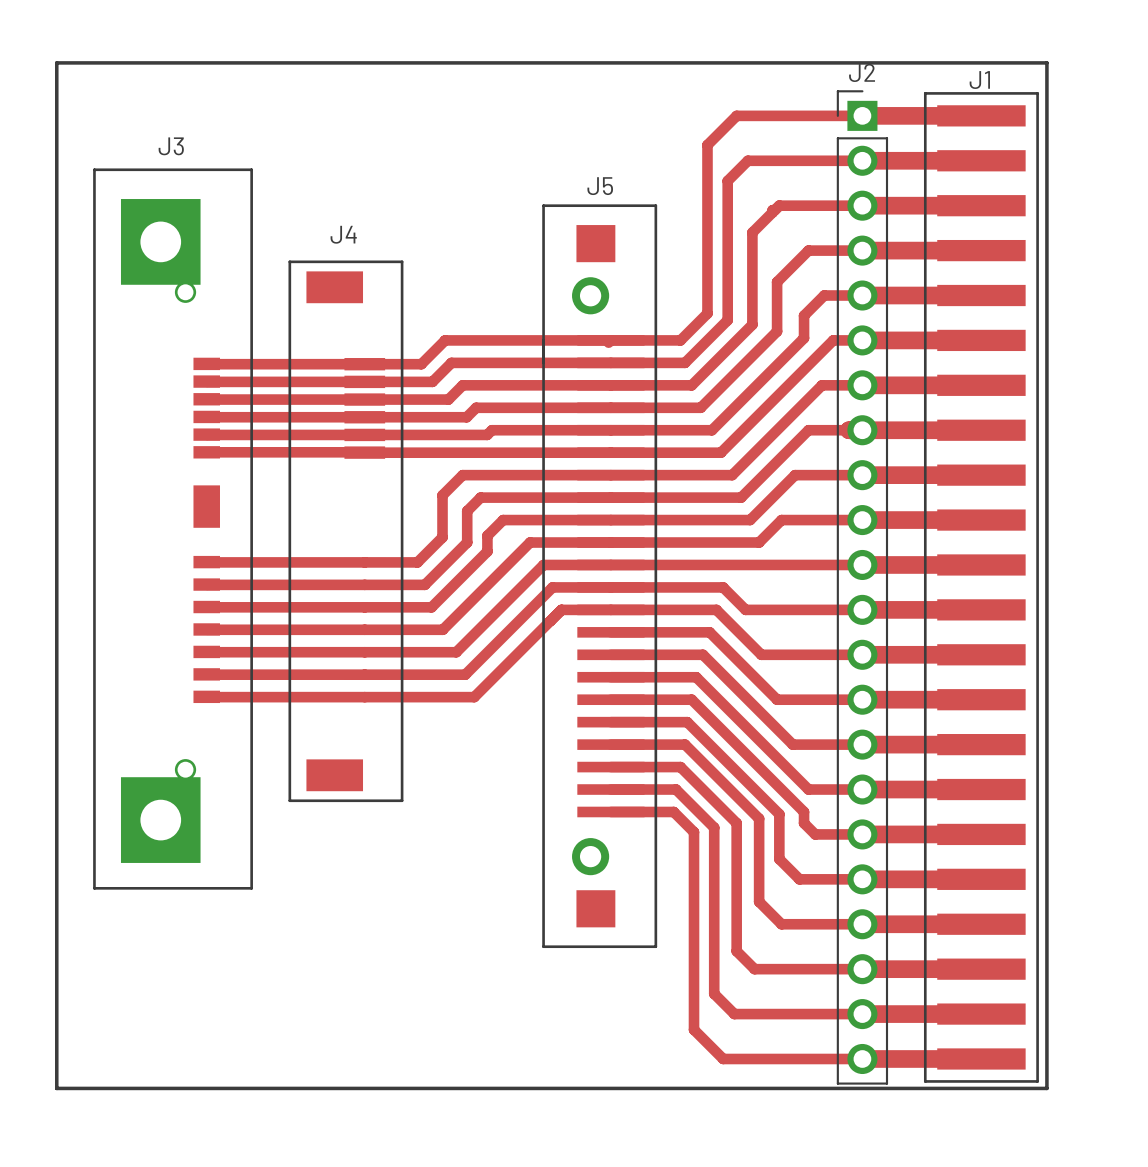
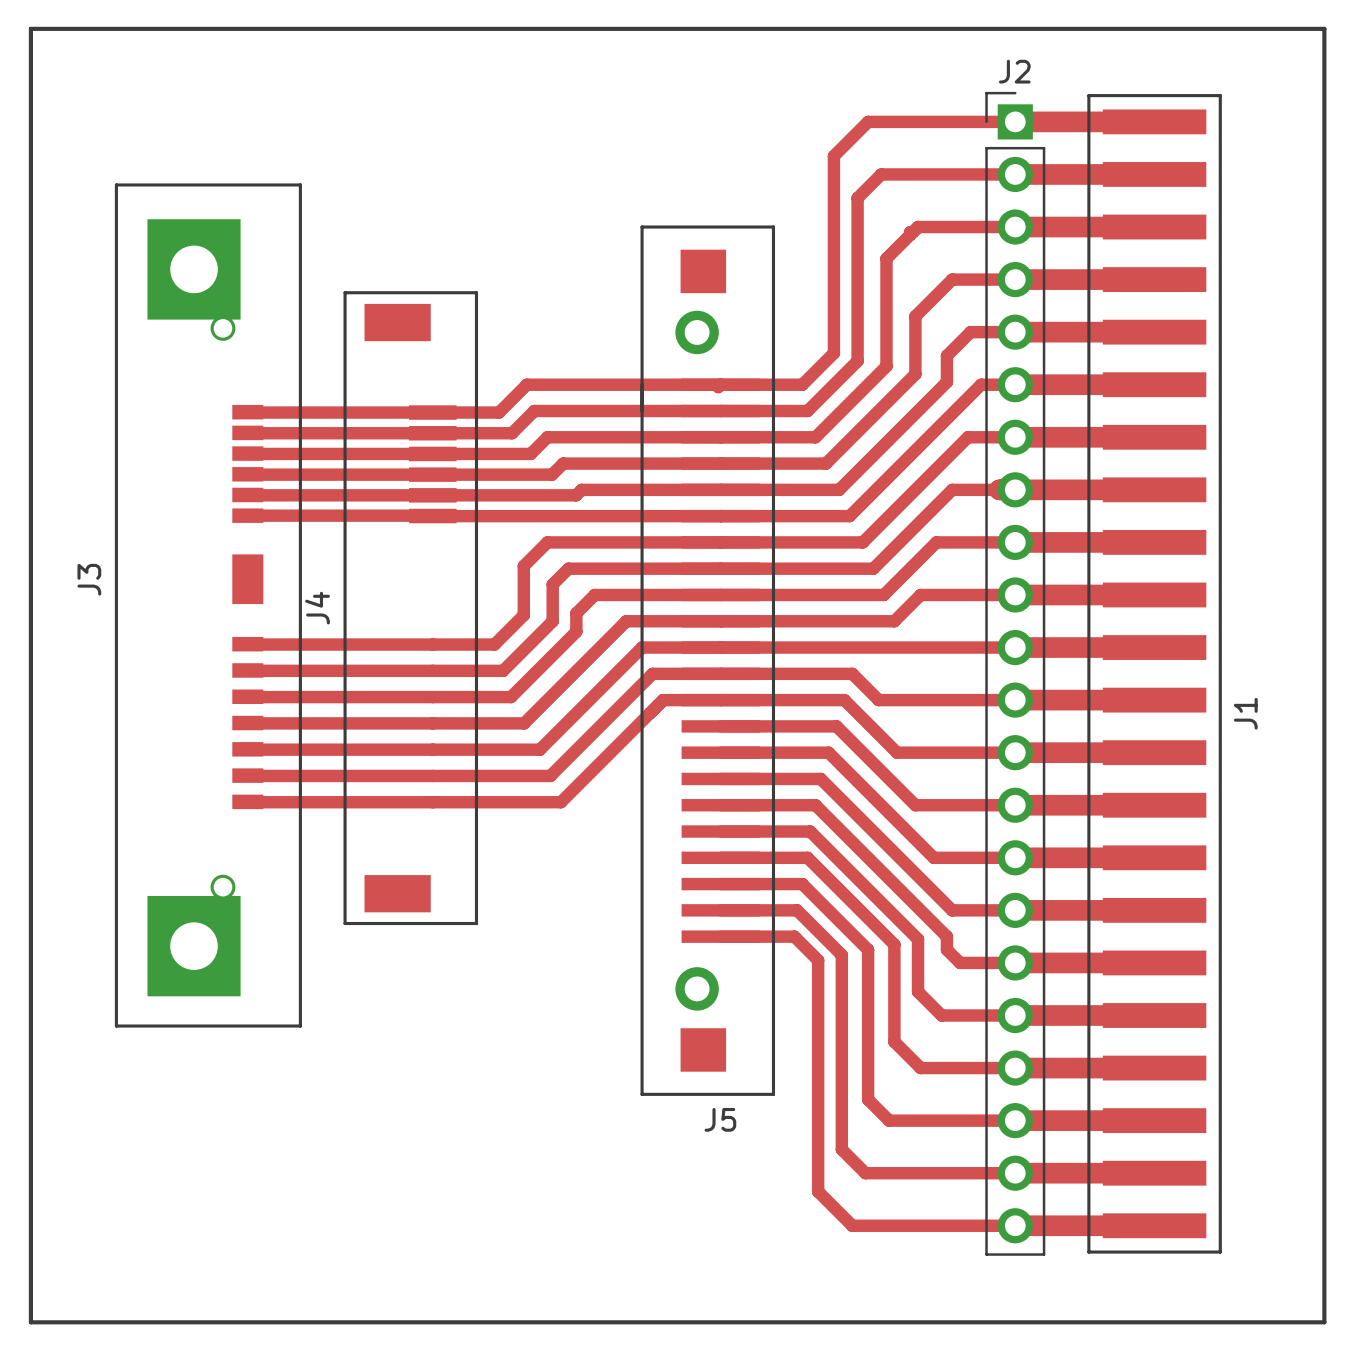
line: (56, 62) (56, 1088) (1046, 1088) (1046, 62) (56, 62) -> (30, 28) (30, 1322) (1324, 1322) (1324, 28) (30, 28)
J1 name rotation: 0° (979, 80) -> 90° counterclockwise (1245, 713)
J1 name position: J1 (979, 80) -> J1 (1245, 713)
J3 name rotation: 0° (171, 146) -> 90° counterclockwise (89, 579)
J3 name position: J3 (171, 146) -> J3 (89, 579)
J5 name position: J5 (600, 186) -> J5 (720, 1119)
J4 name rotation: 0° (343, 234) -> 90° counterclockwise (317, 608)
J4 name position: J4 (343, 234) -> J4 (317, 608)

